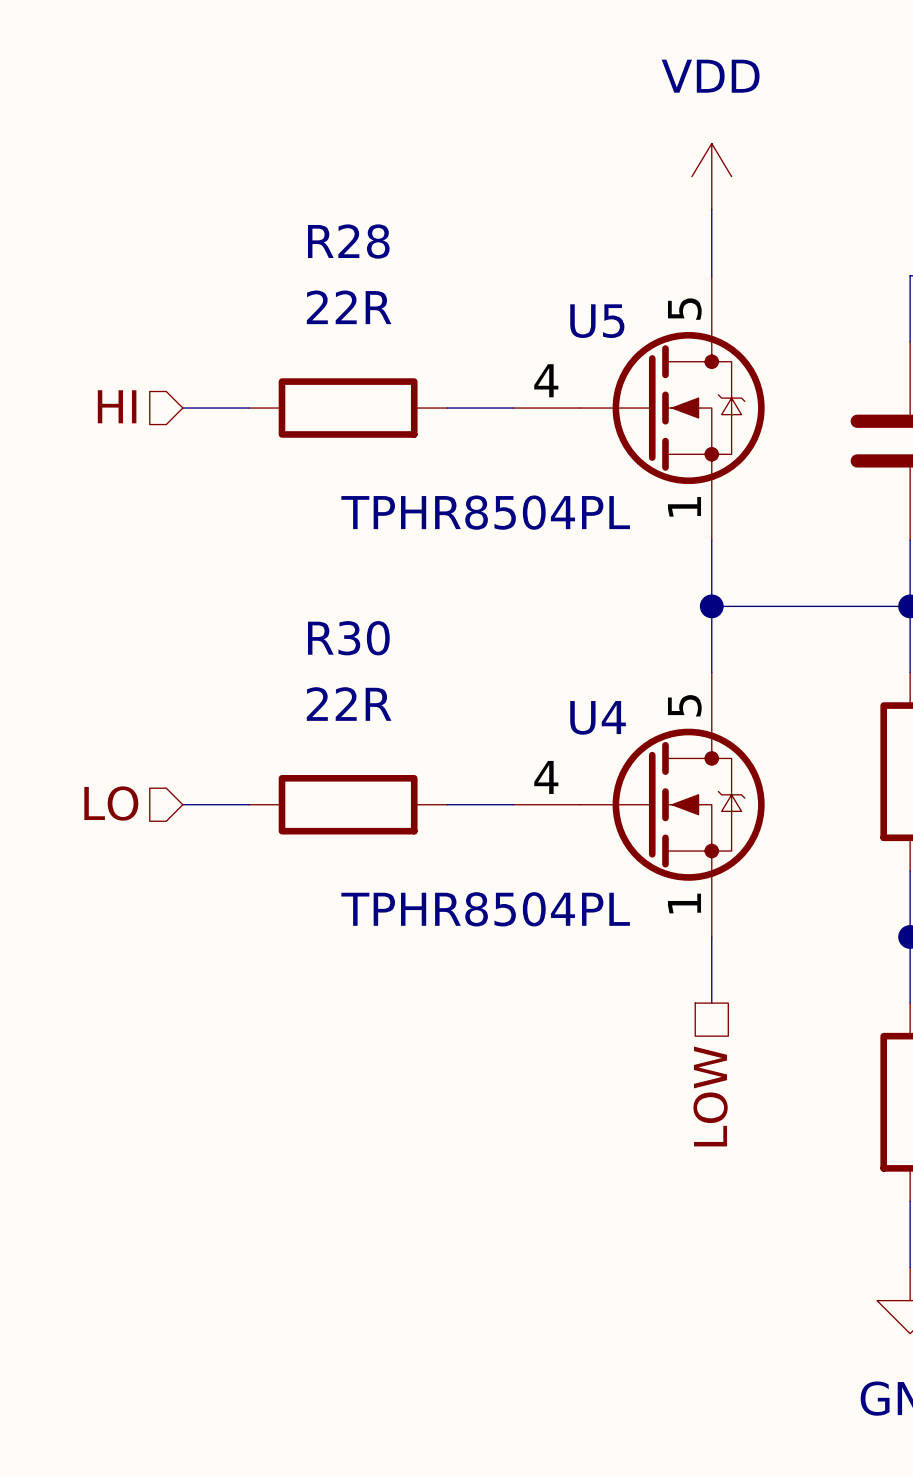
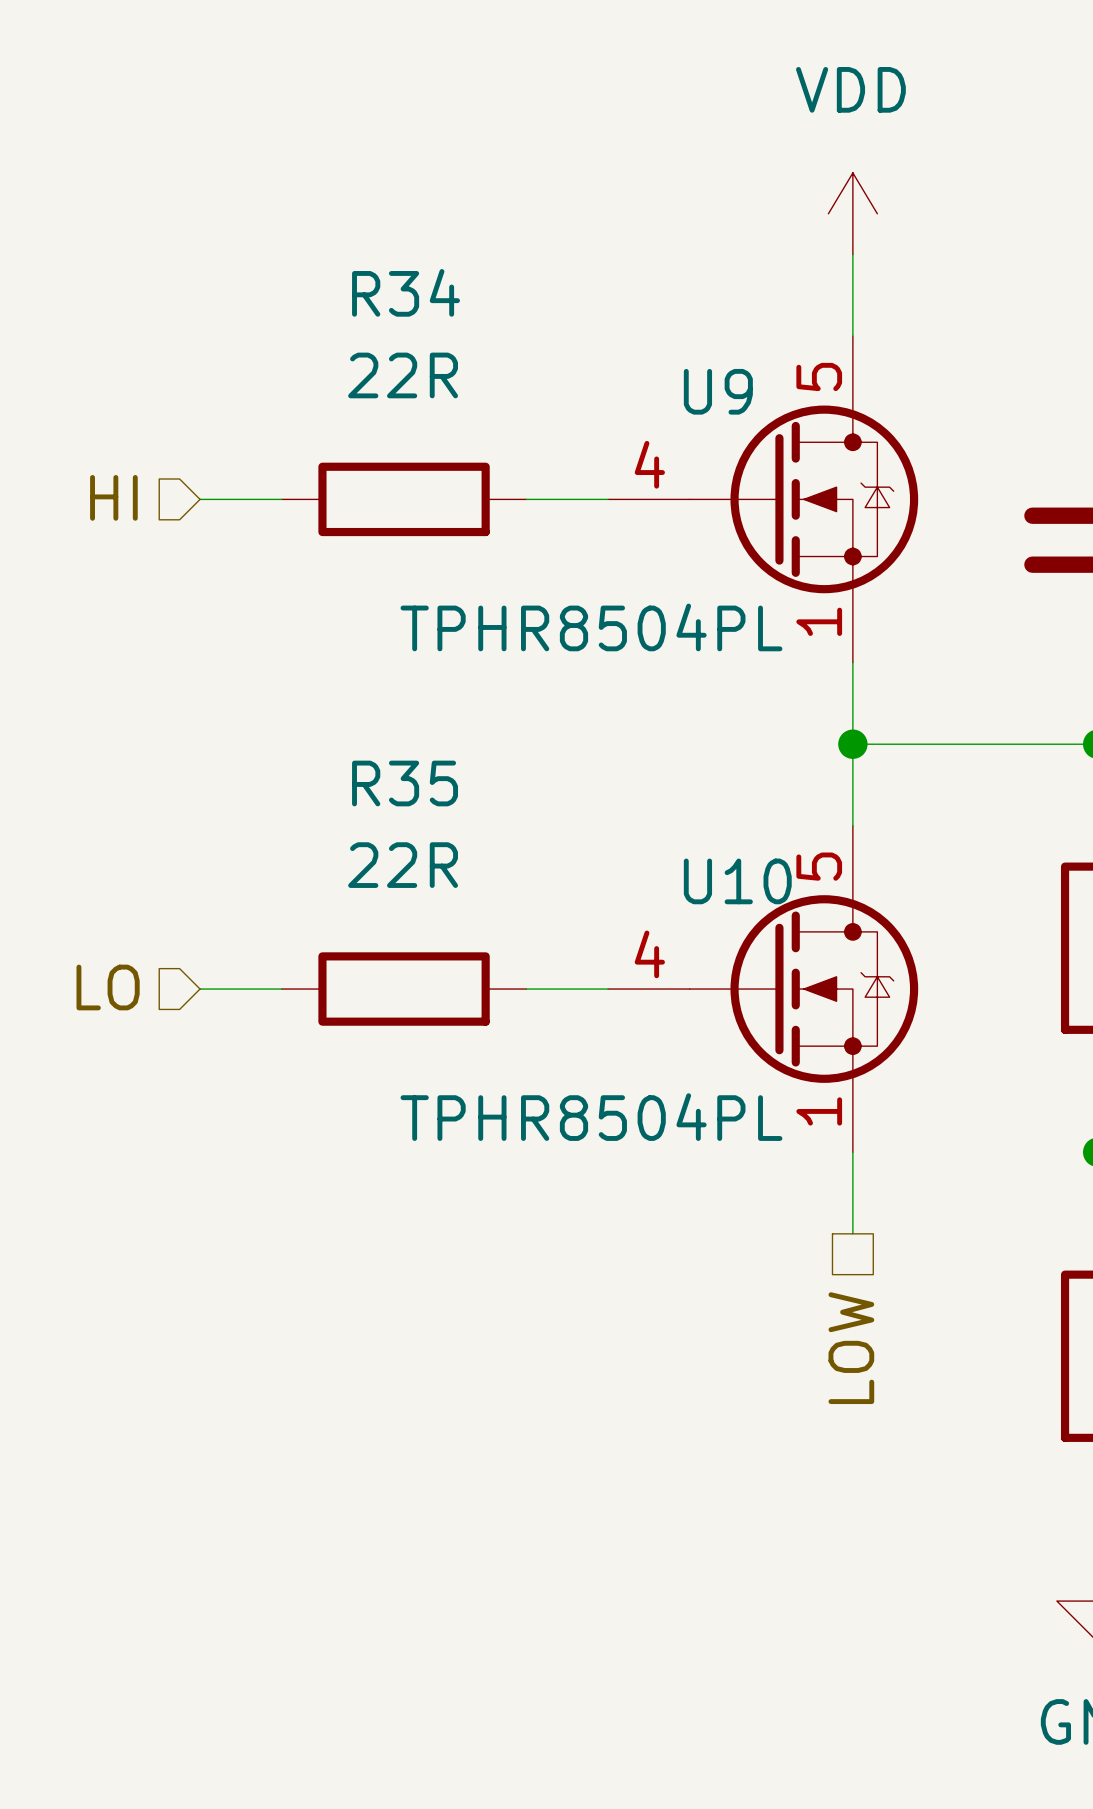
R28 name: R28 (348, 241) -> R34 (406, 292)
U5 name: U5 (597, 321) -> U9 (718, 391)
R30 name: R30 (348, 638) -> R35 (405, 783)
U4 name: U4 (598, 717) -> U10 (737, 881)

